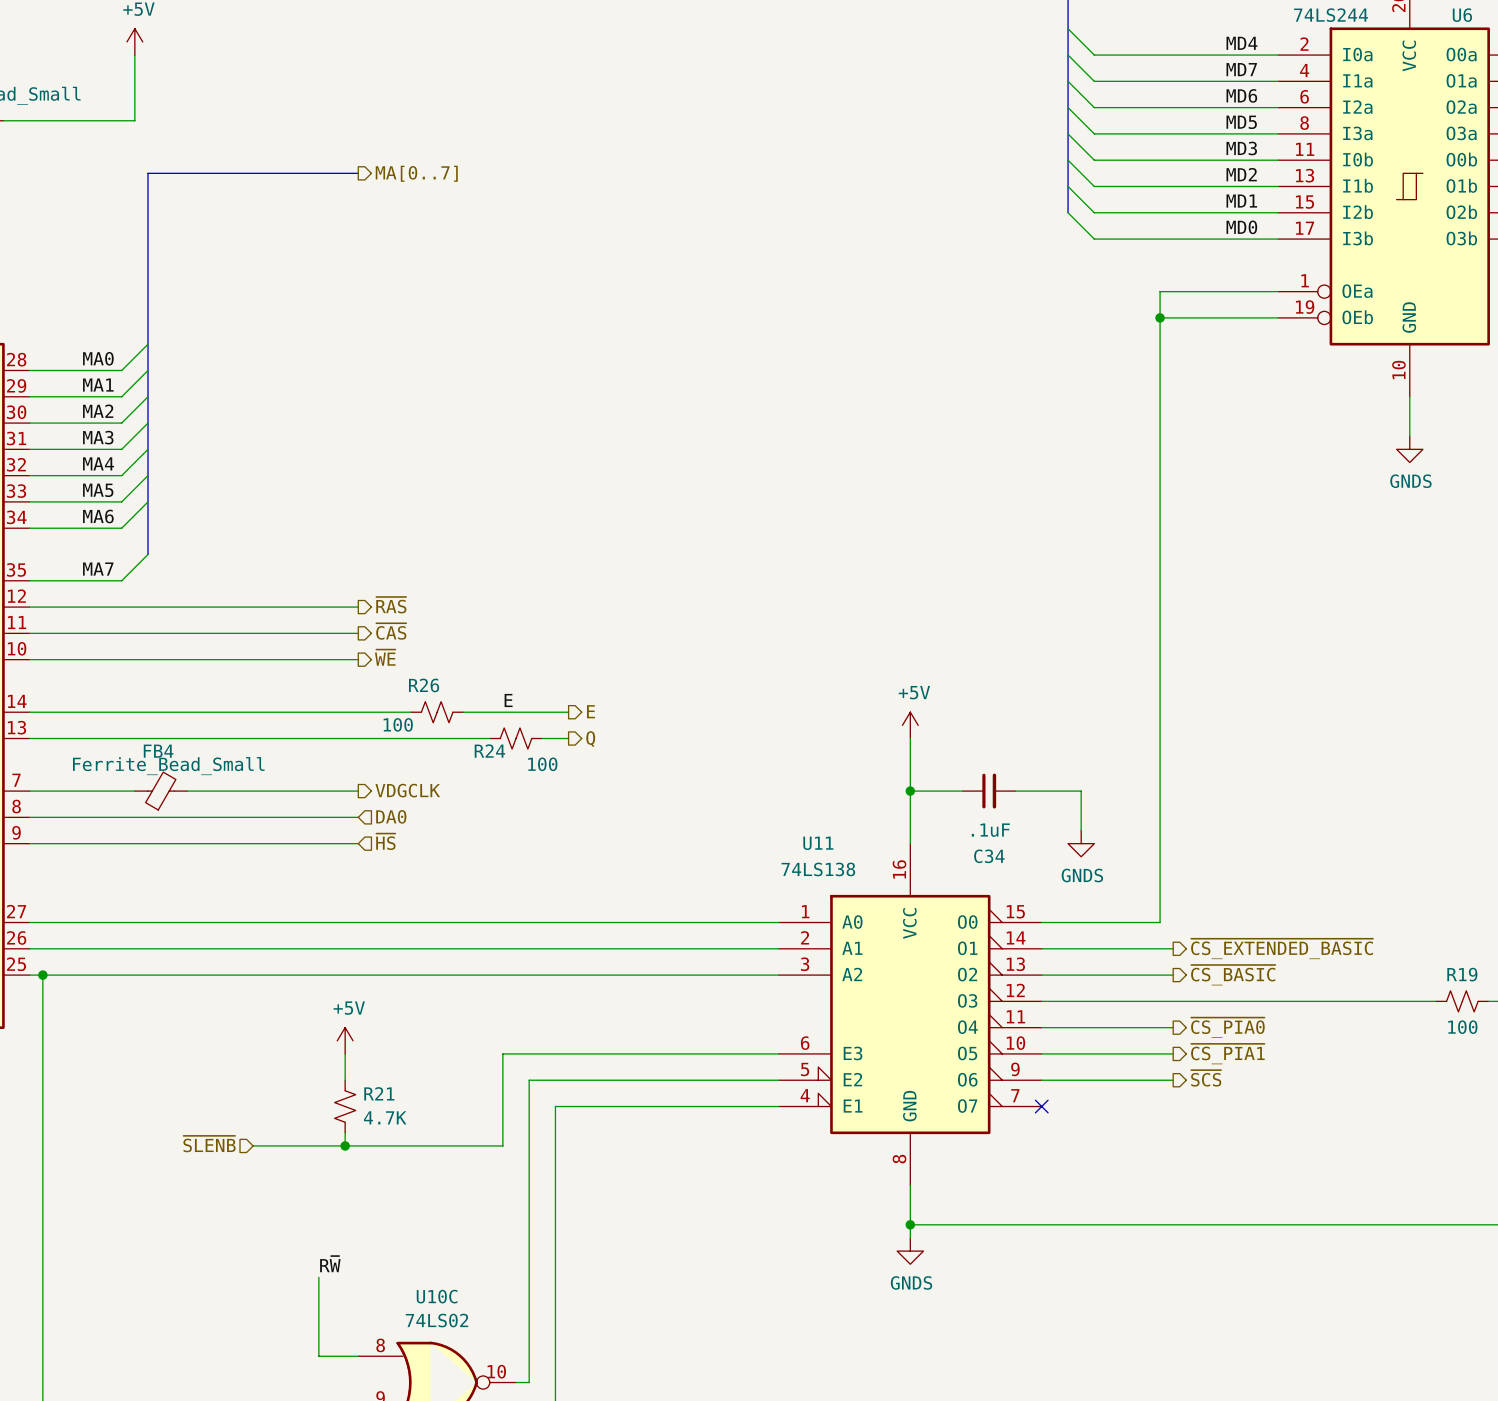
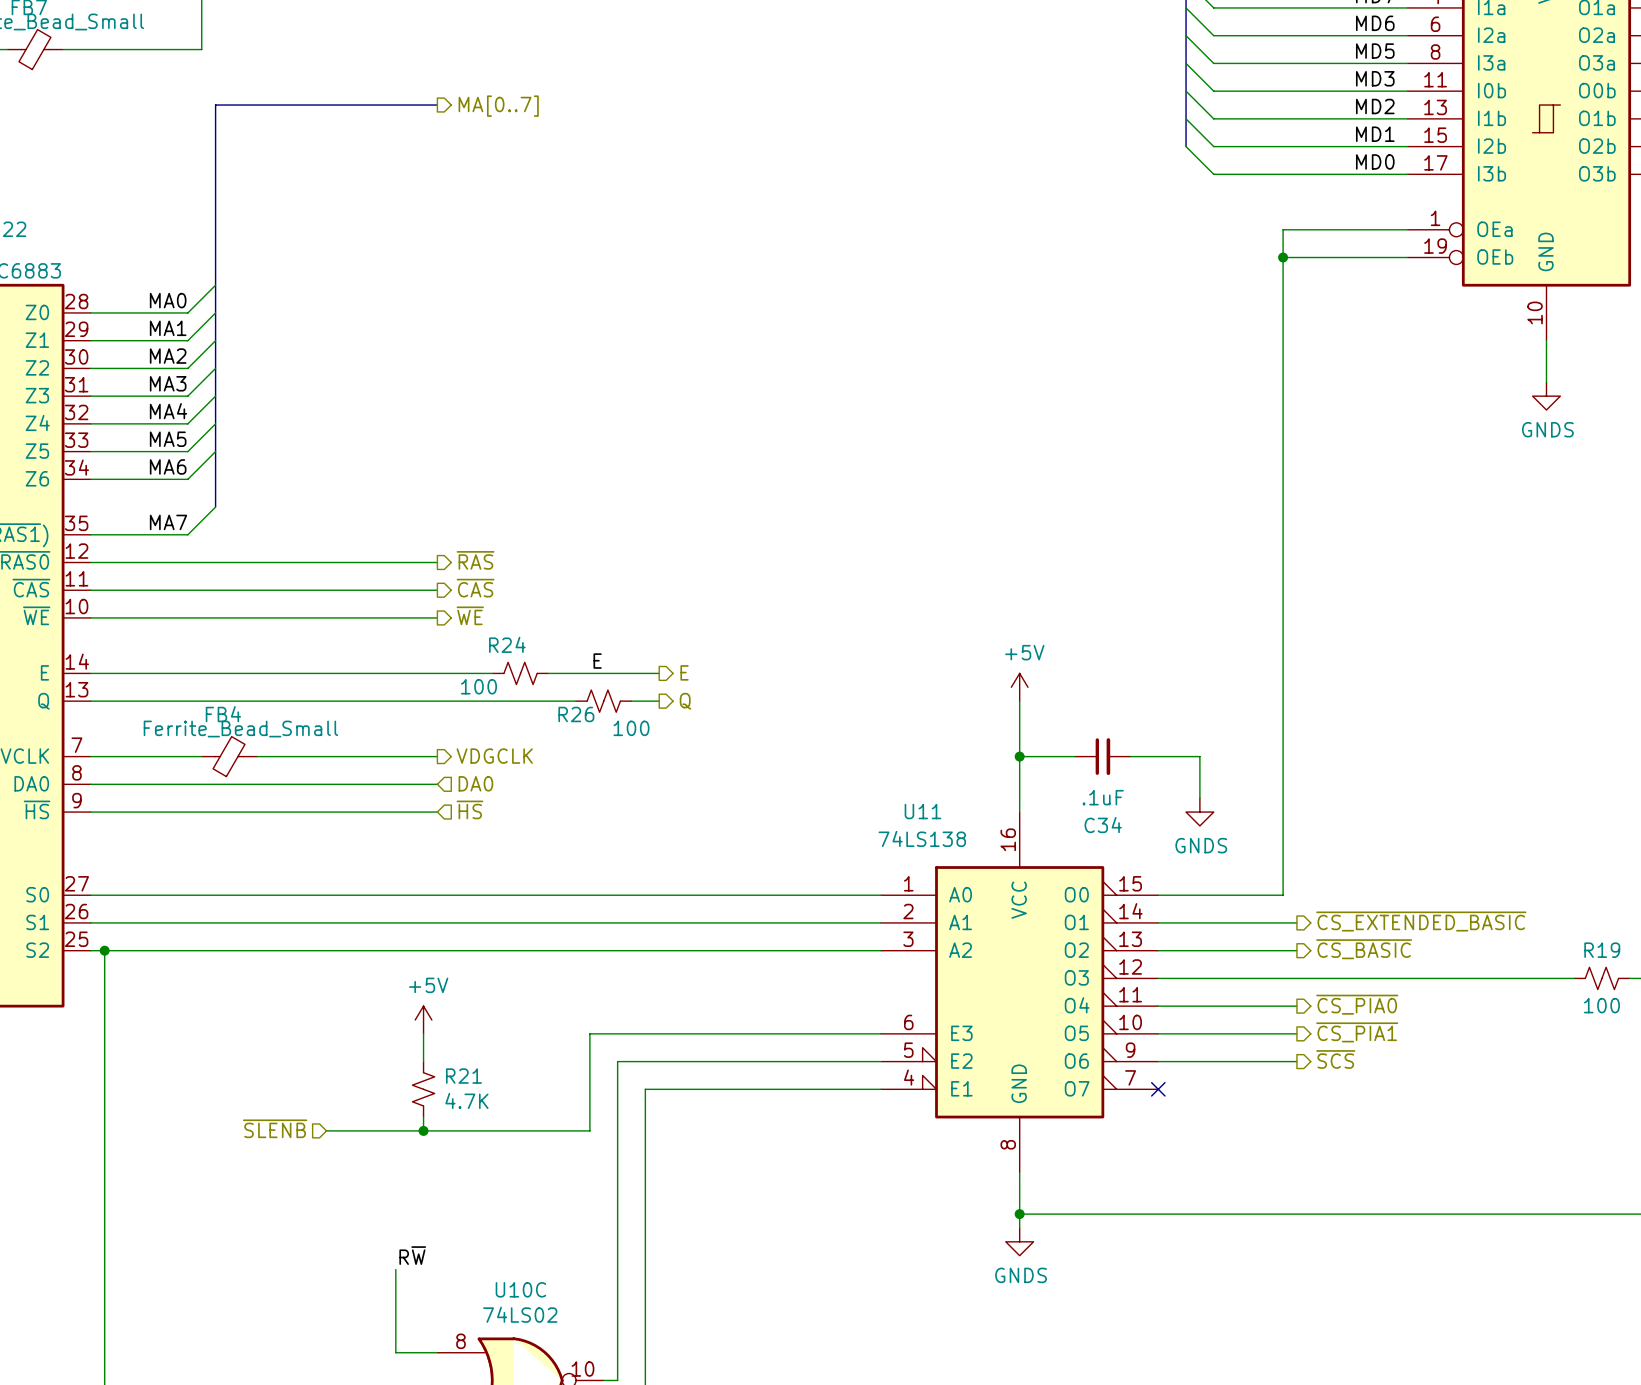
R26 name: R26 (424, 685) -> R24 (507, 644)
R24 name: R24 (489, 751) -> R26 (576, 714)

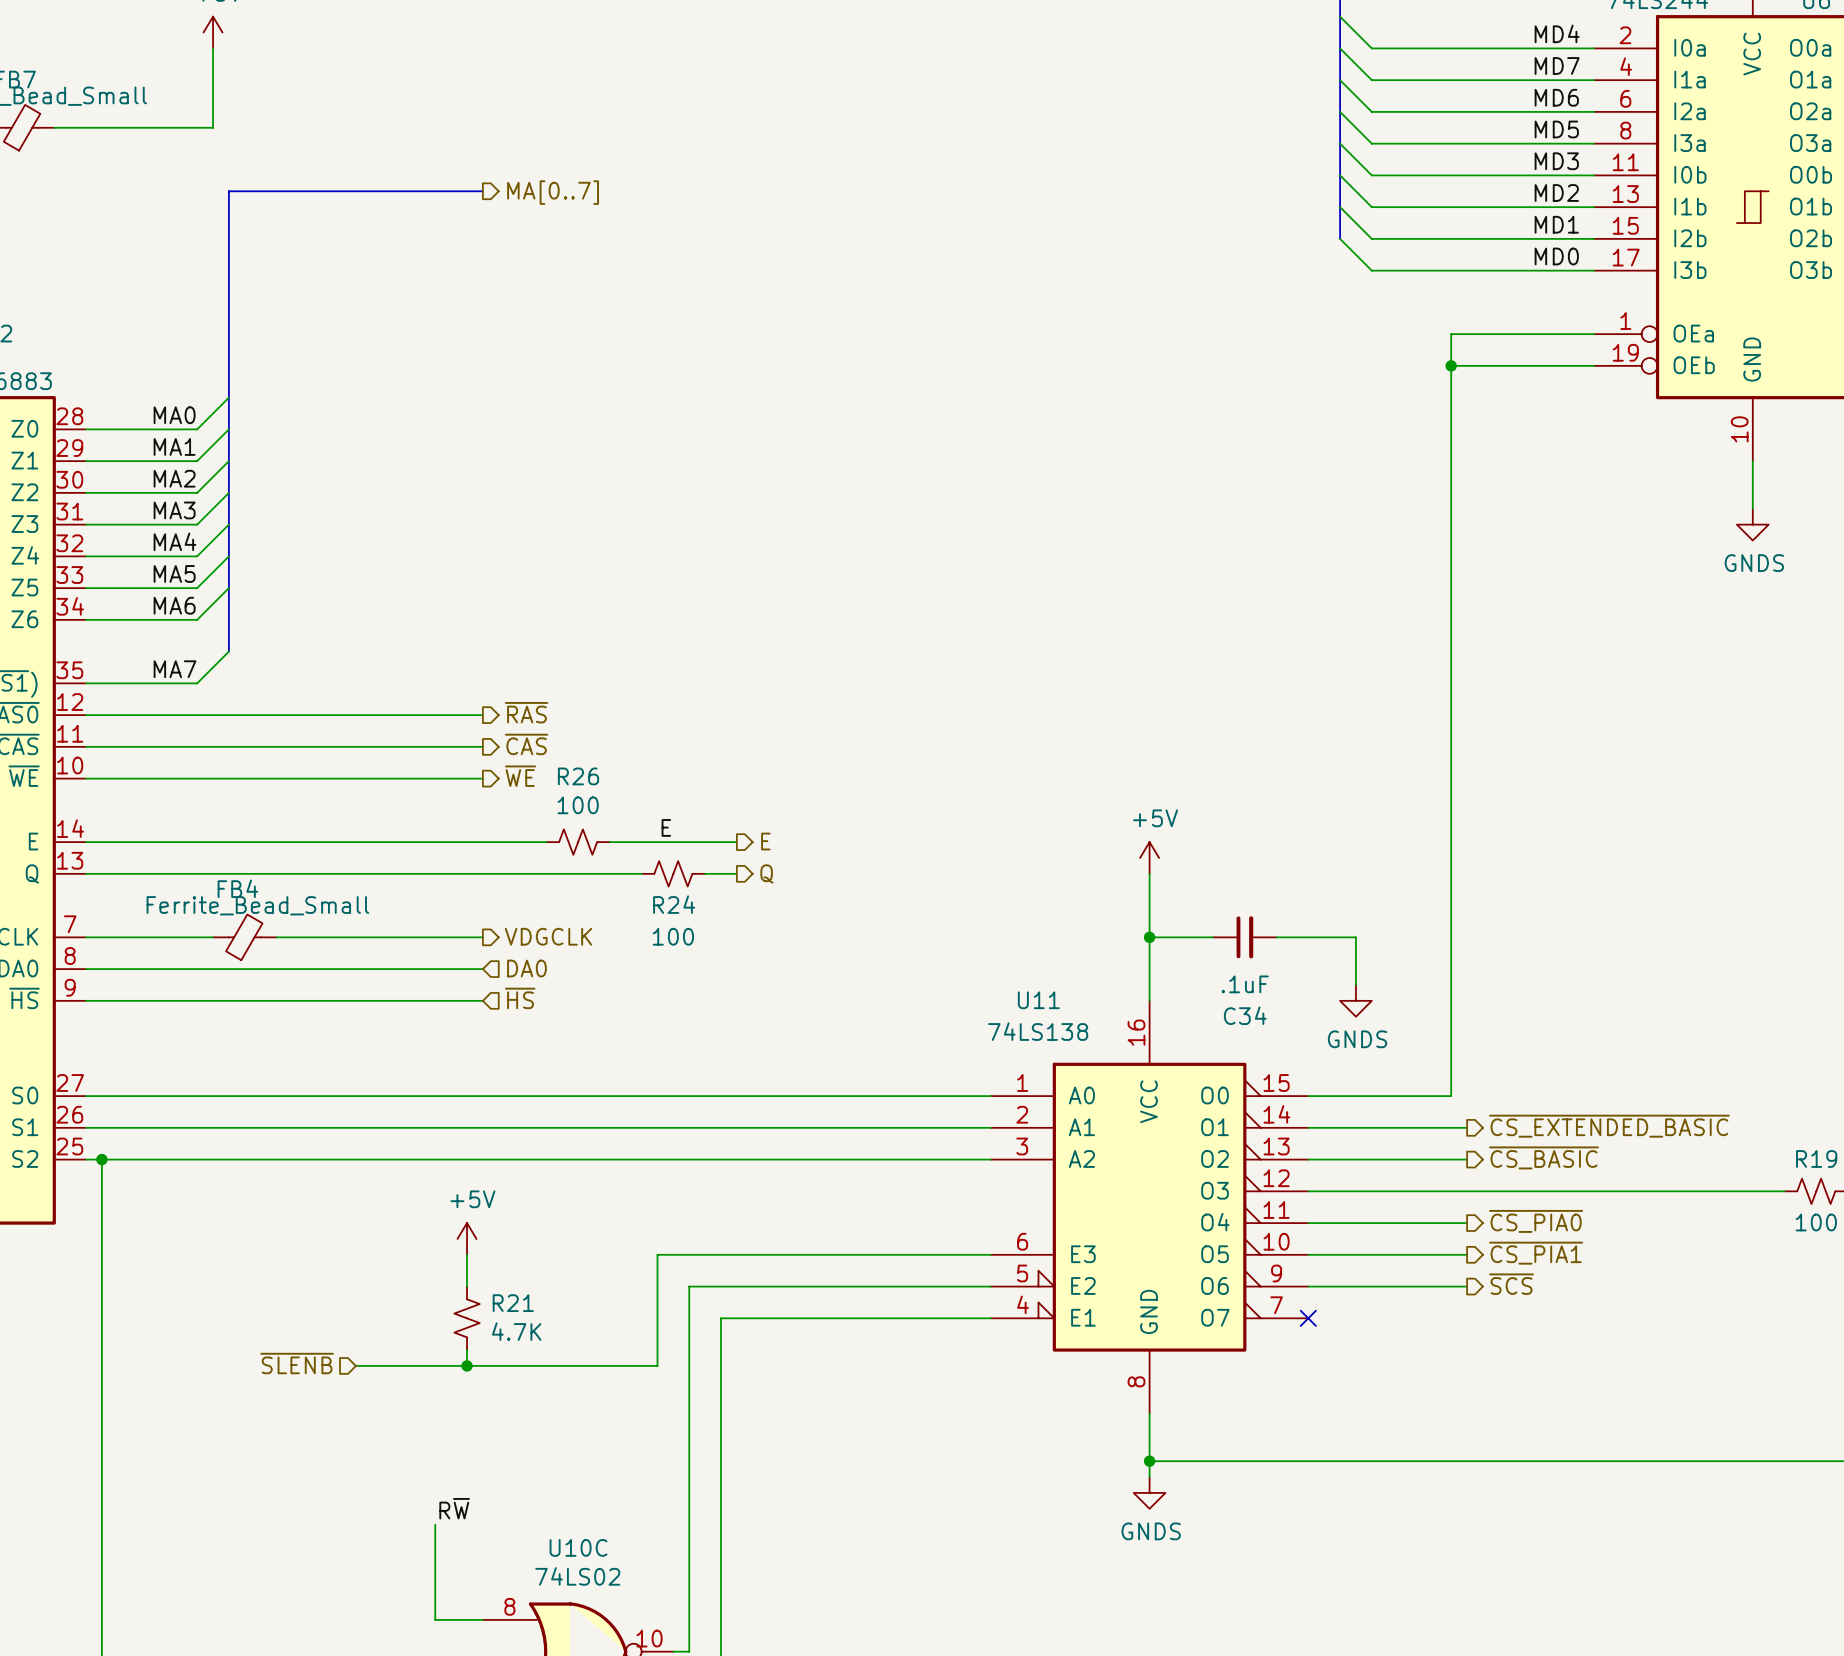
R24 name: R24 (507, 644) -> R26 (578, 776)
R24 value position: 100 (478, 686) -> 100 (578, 805)
R26 name: R26 (576, 714) -> R24 (674, 904)
R26 value position: 100 (631, 728) -> 100 (673, 936)

